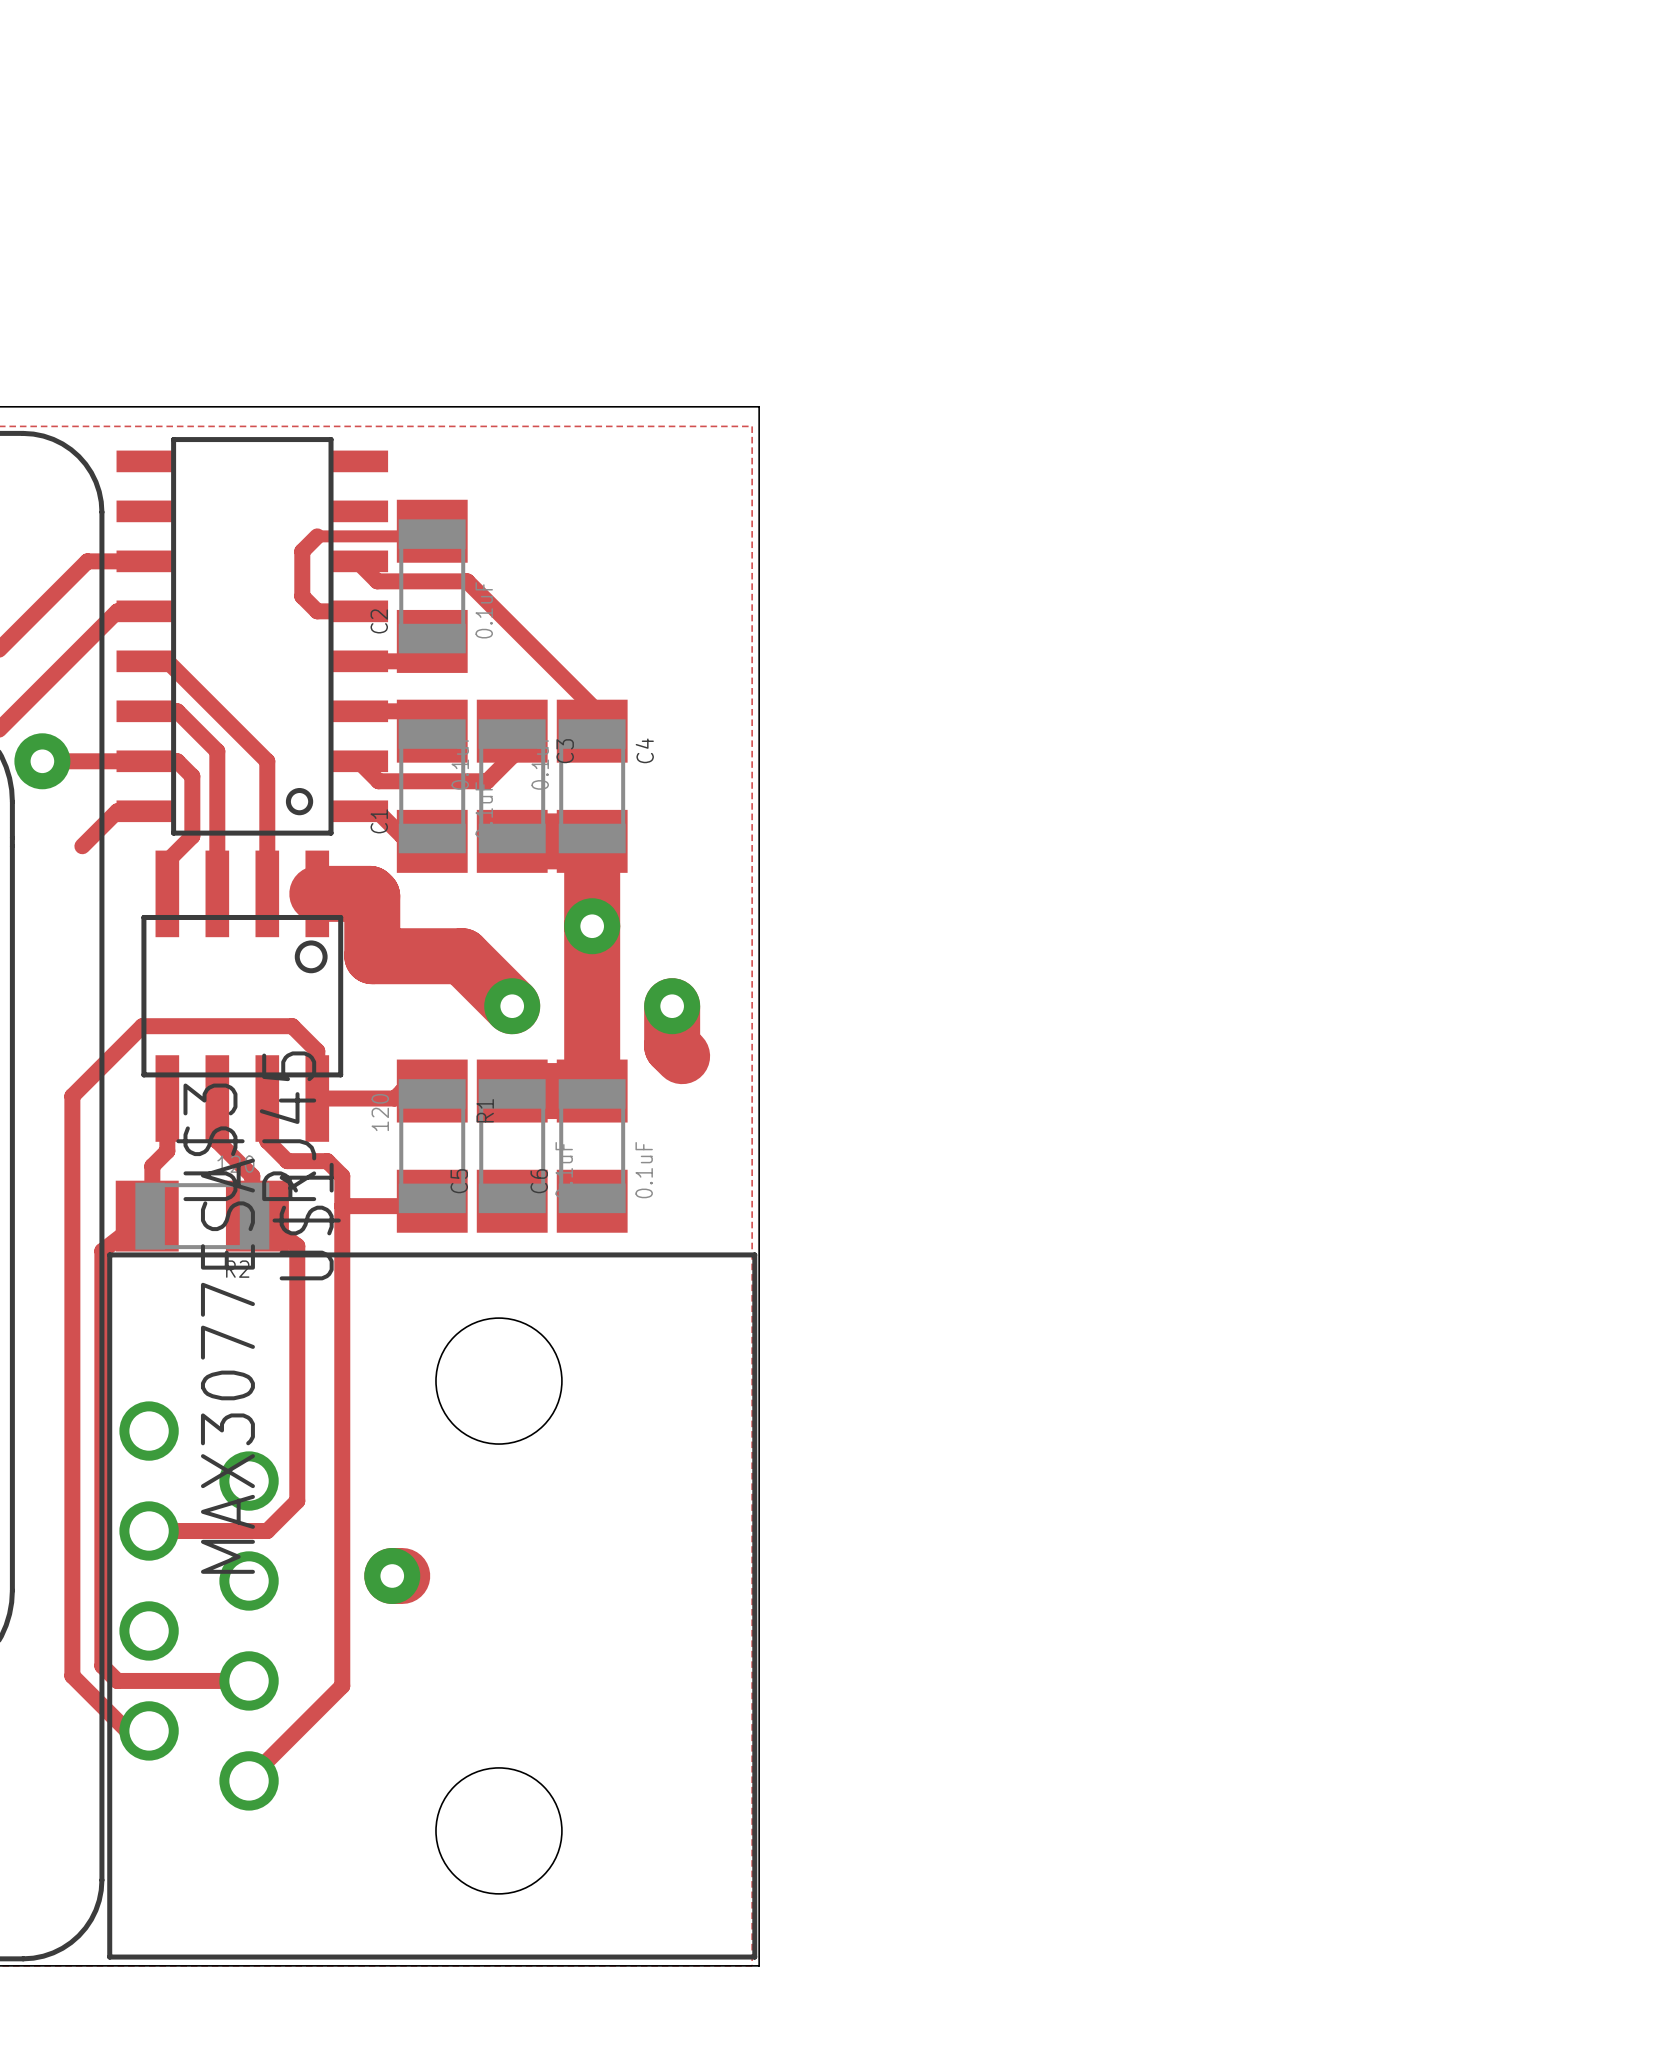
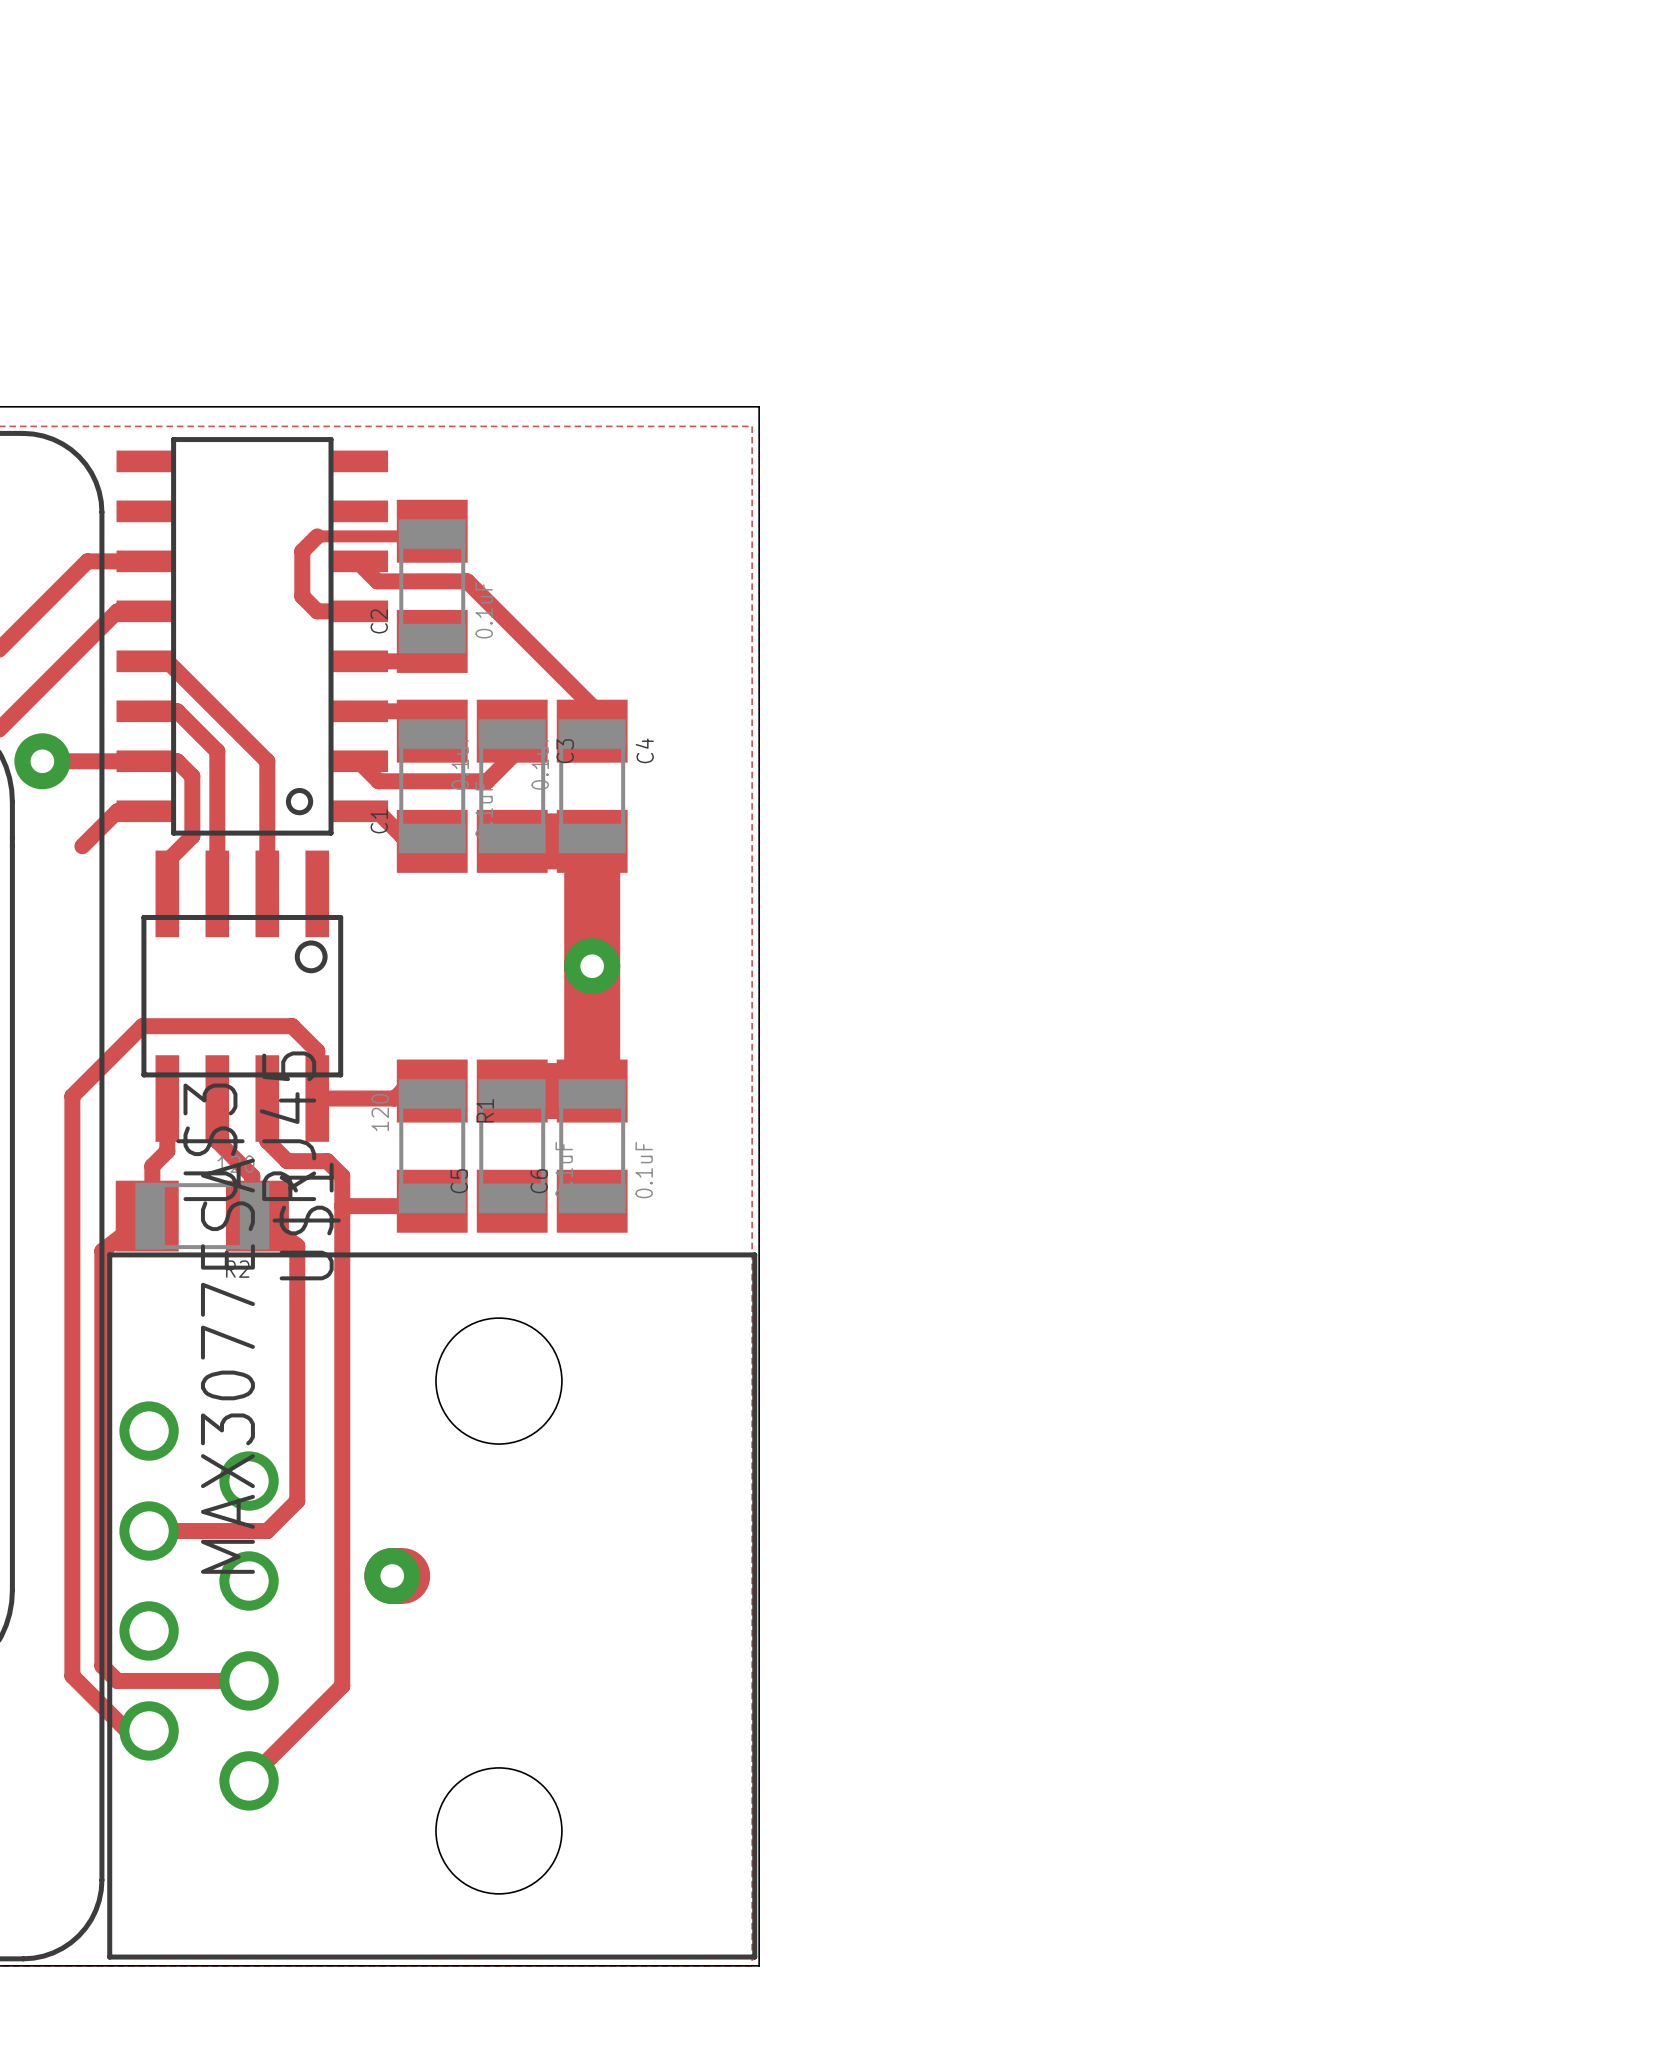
track: (317, 893) (369, 893) (372, 896) (372, 956) (462, 956) (512, 1006) -> none
via position: (592, 926) -> (592, 966)
via: (512, 1006) -> none
track: (672, 1006) (672, 1046) (682, 1056) -> none
via: (672, 1006) -> none

